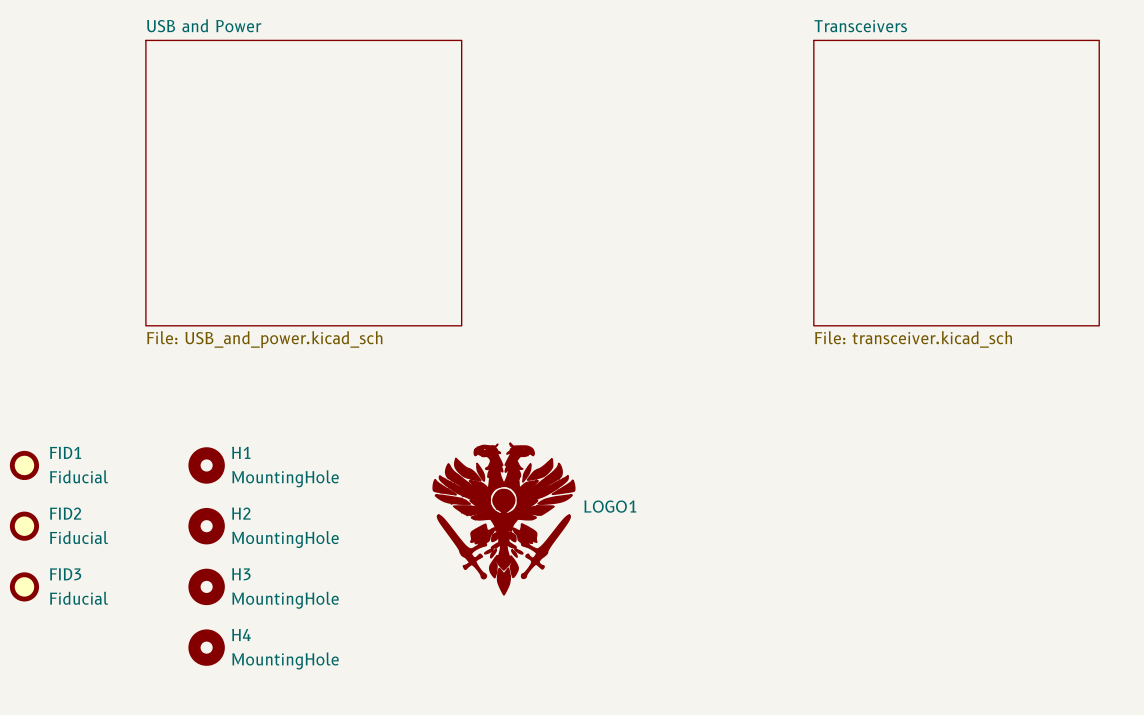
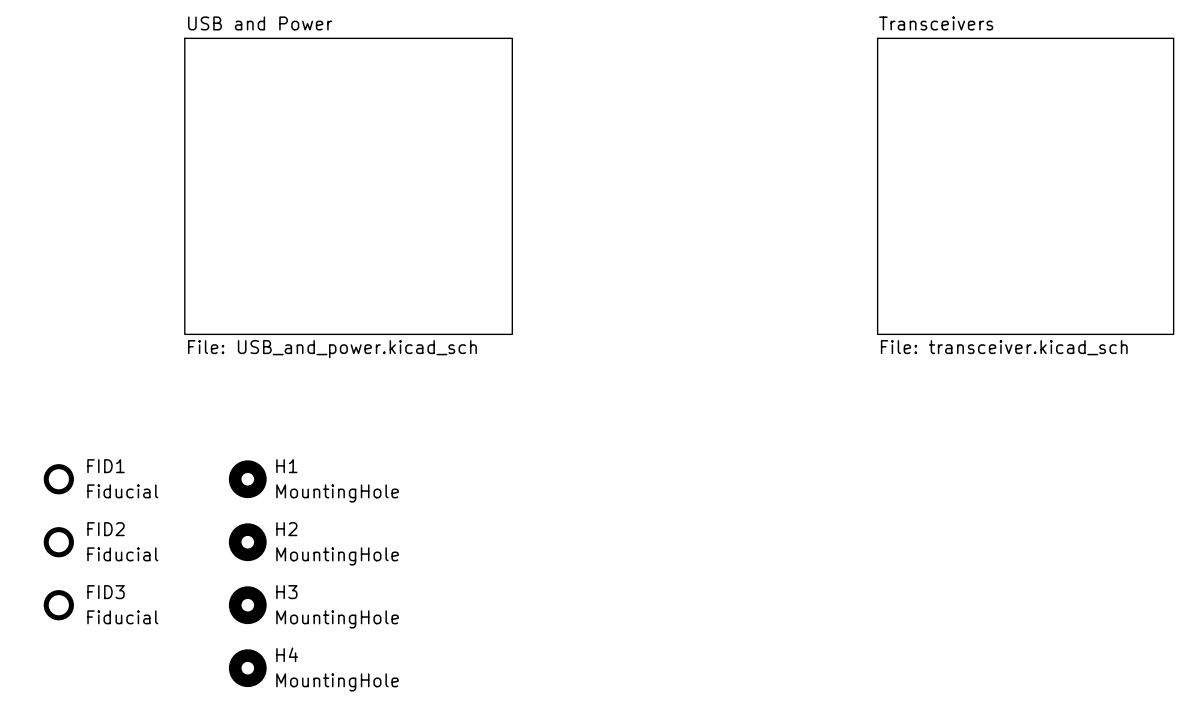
LOGO1: (503, 519) -> none

